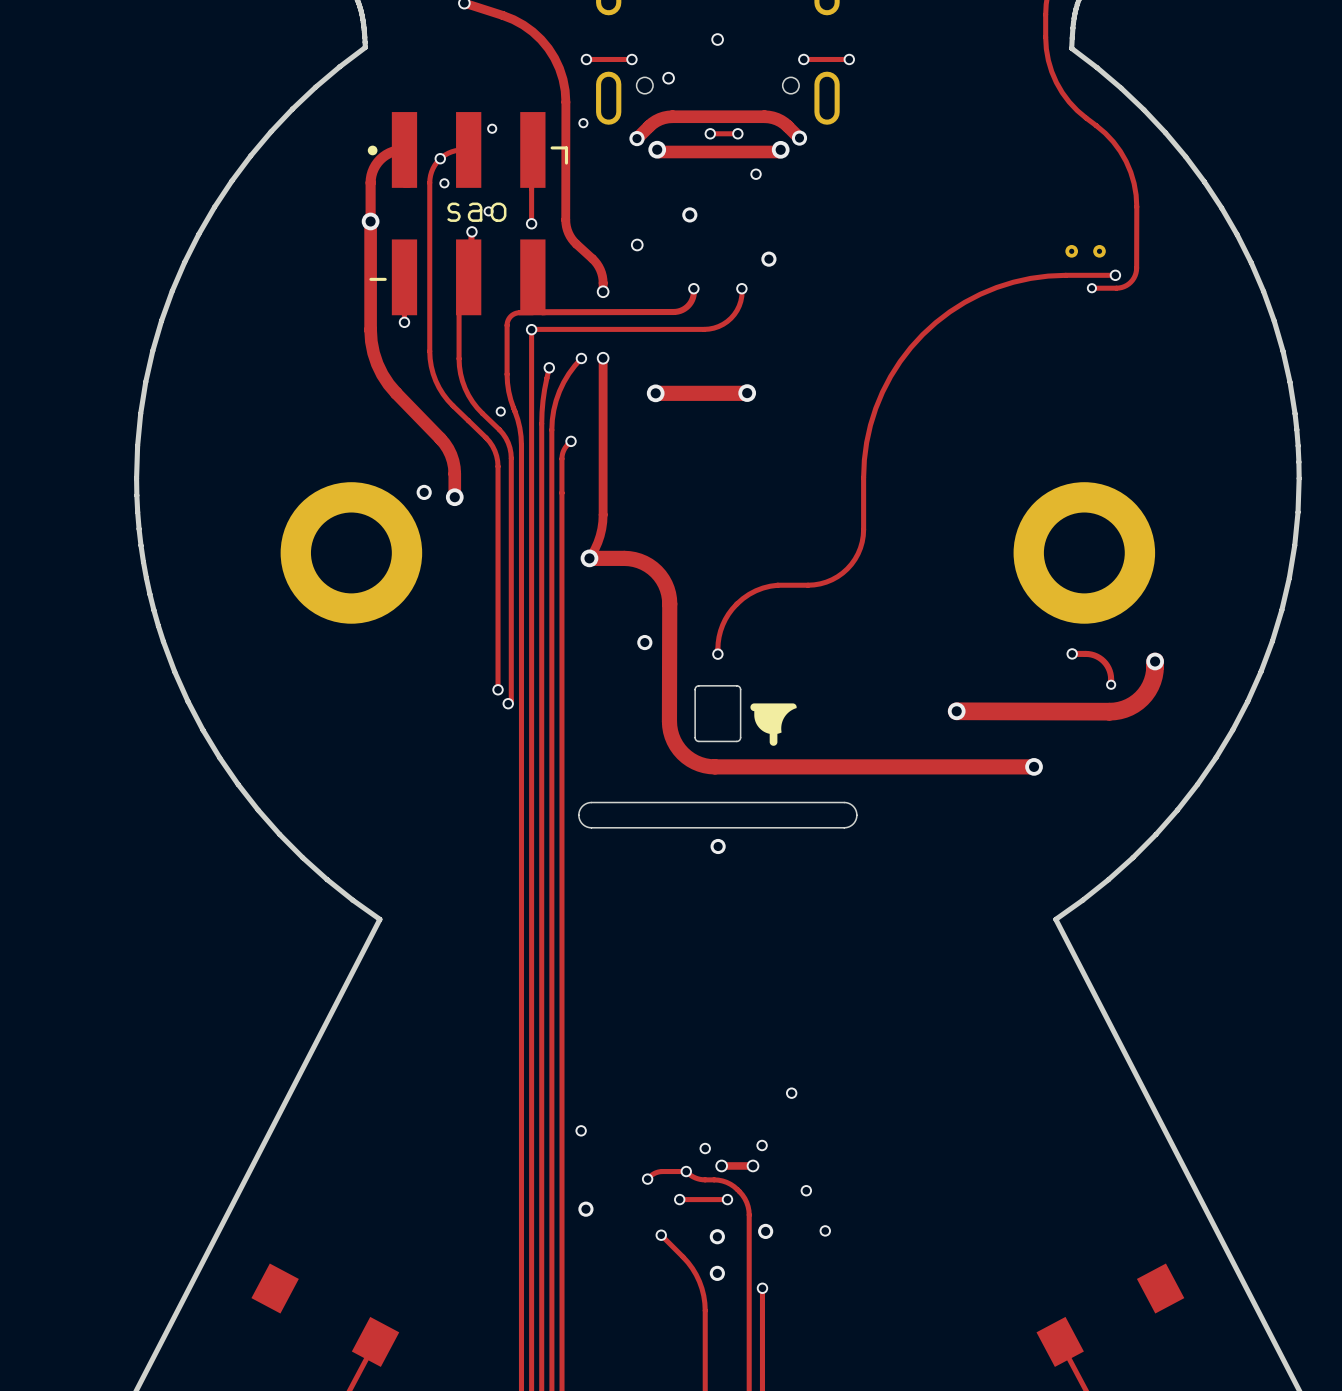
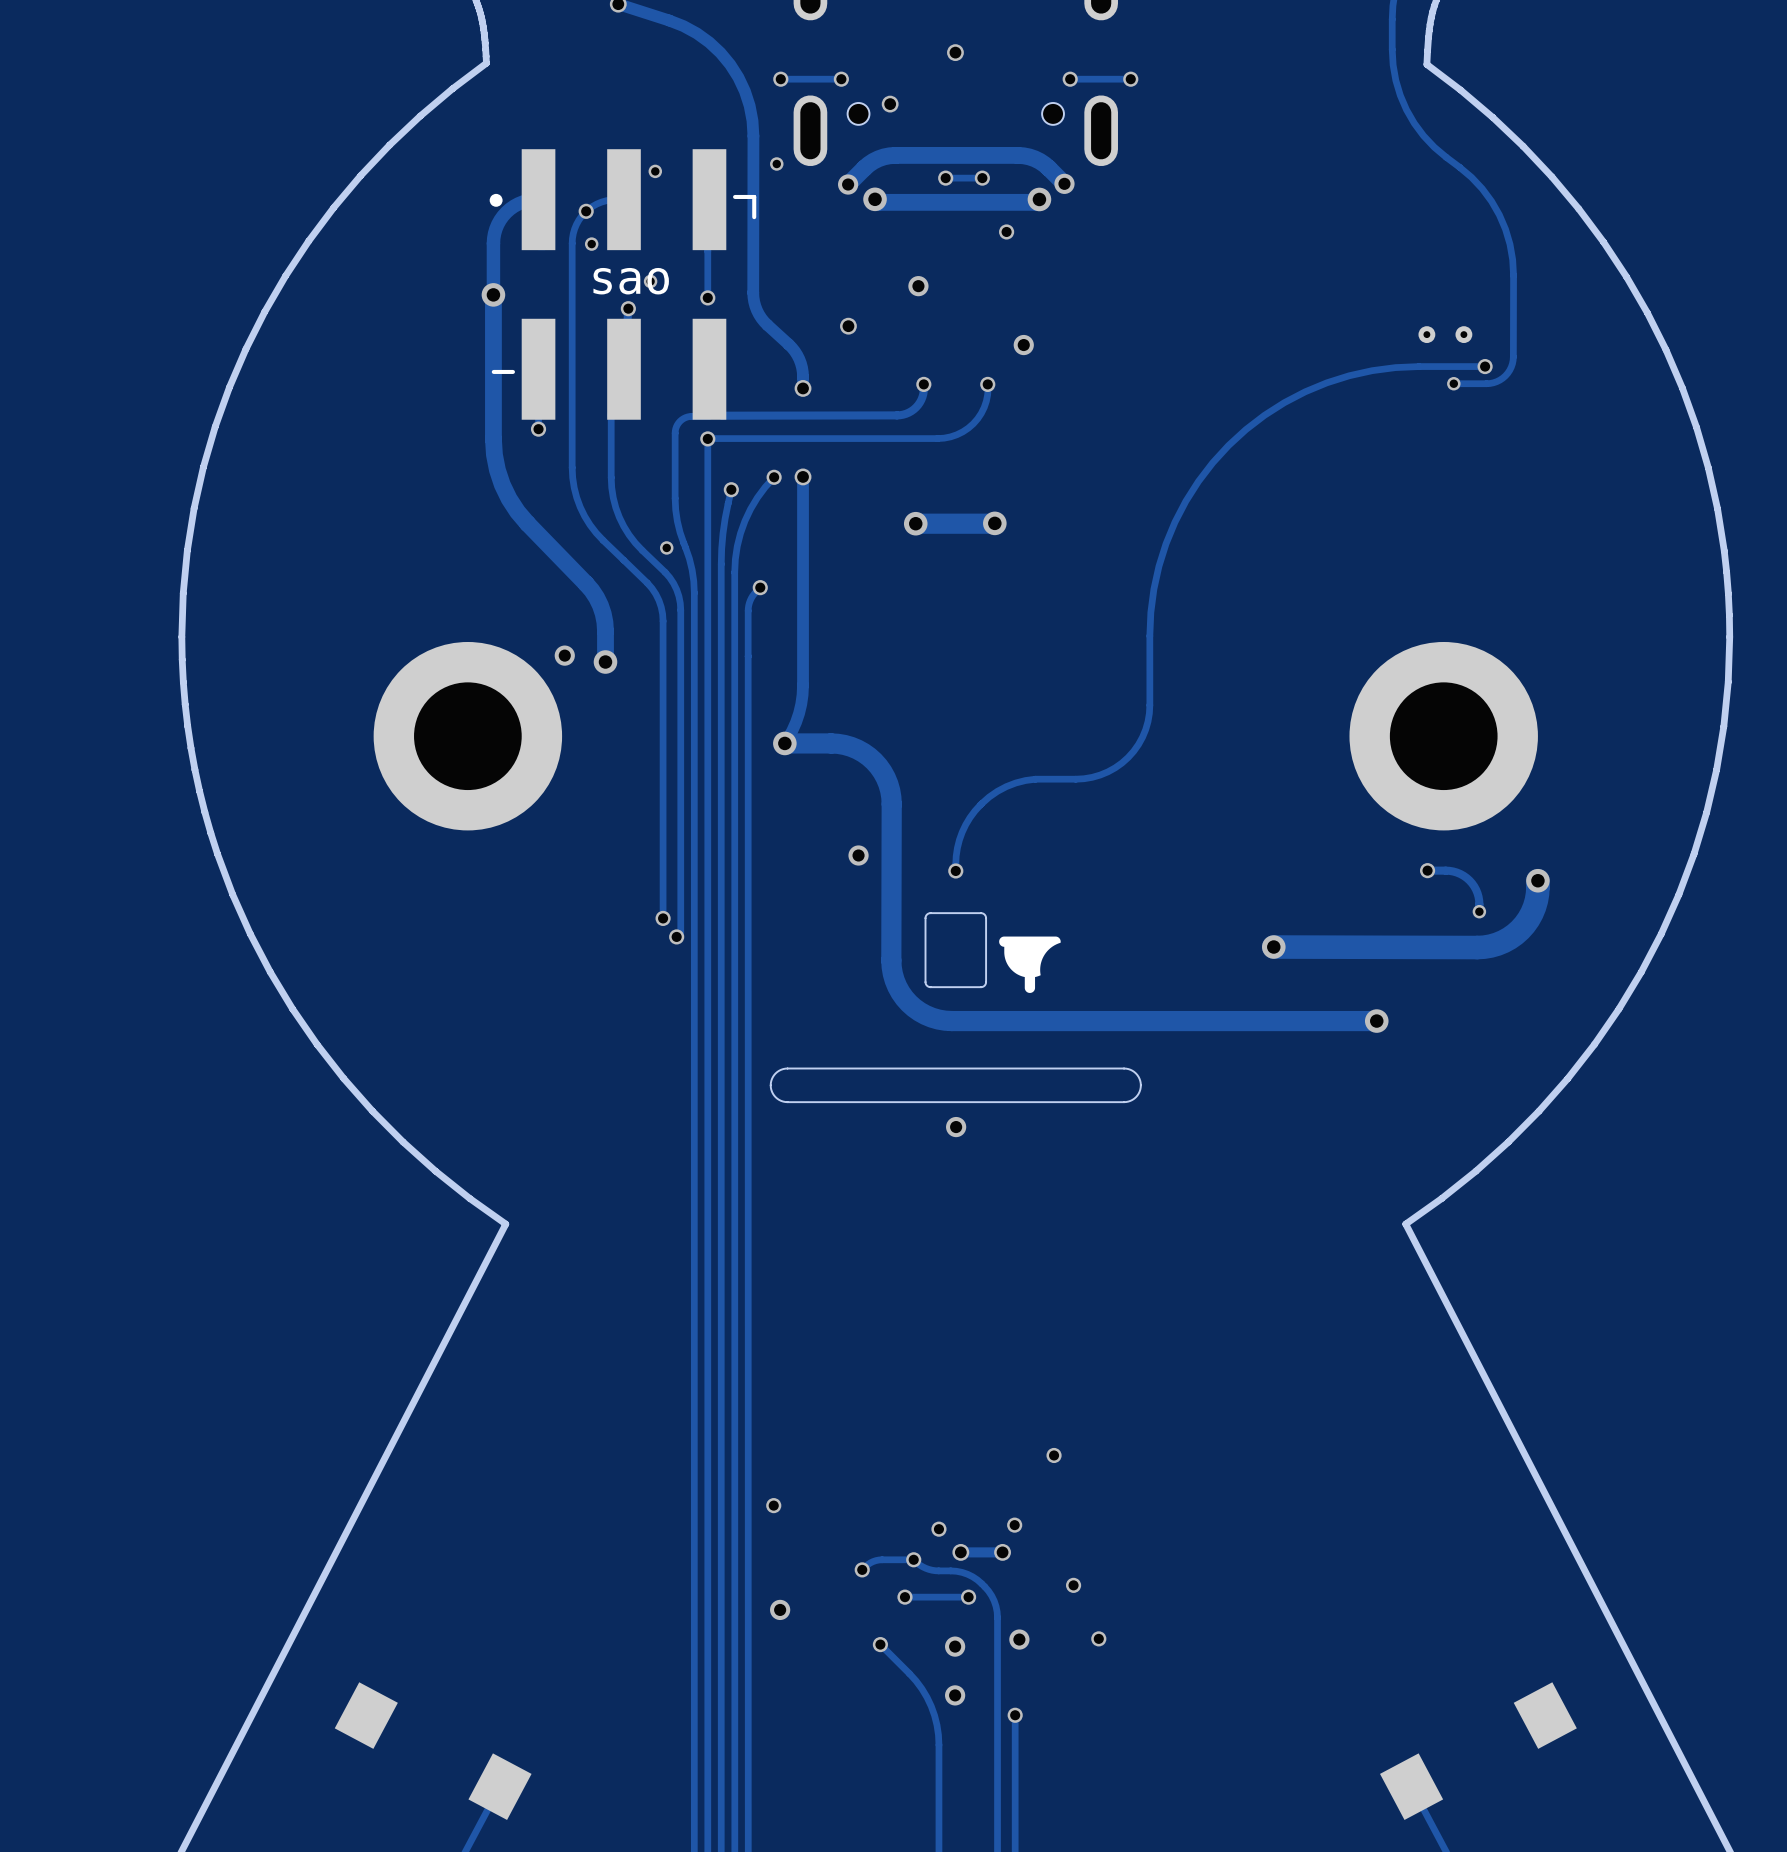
track: (655, 393) (687, 393) -> none
via position: (655, 393) -> (915, 523)

